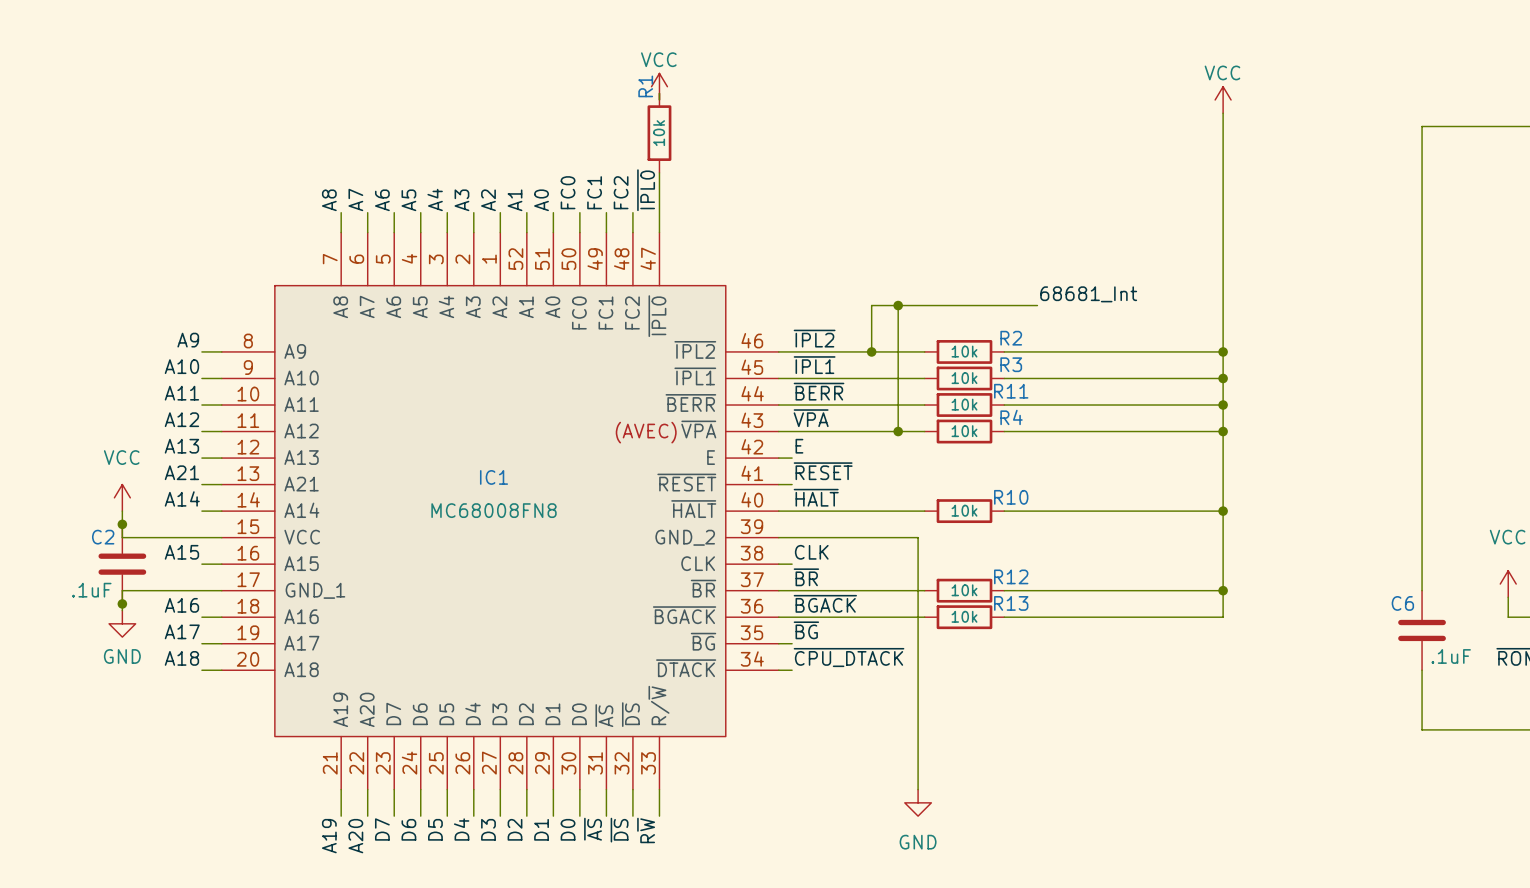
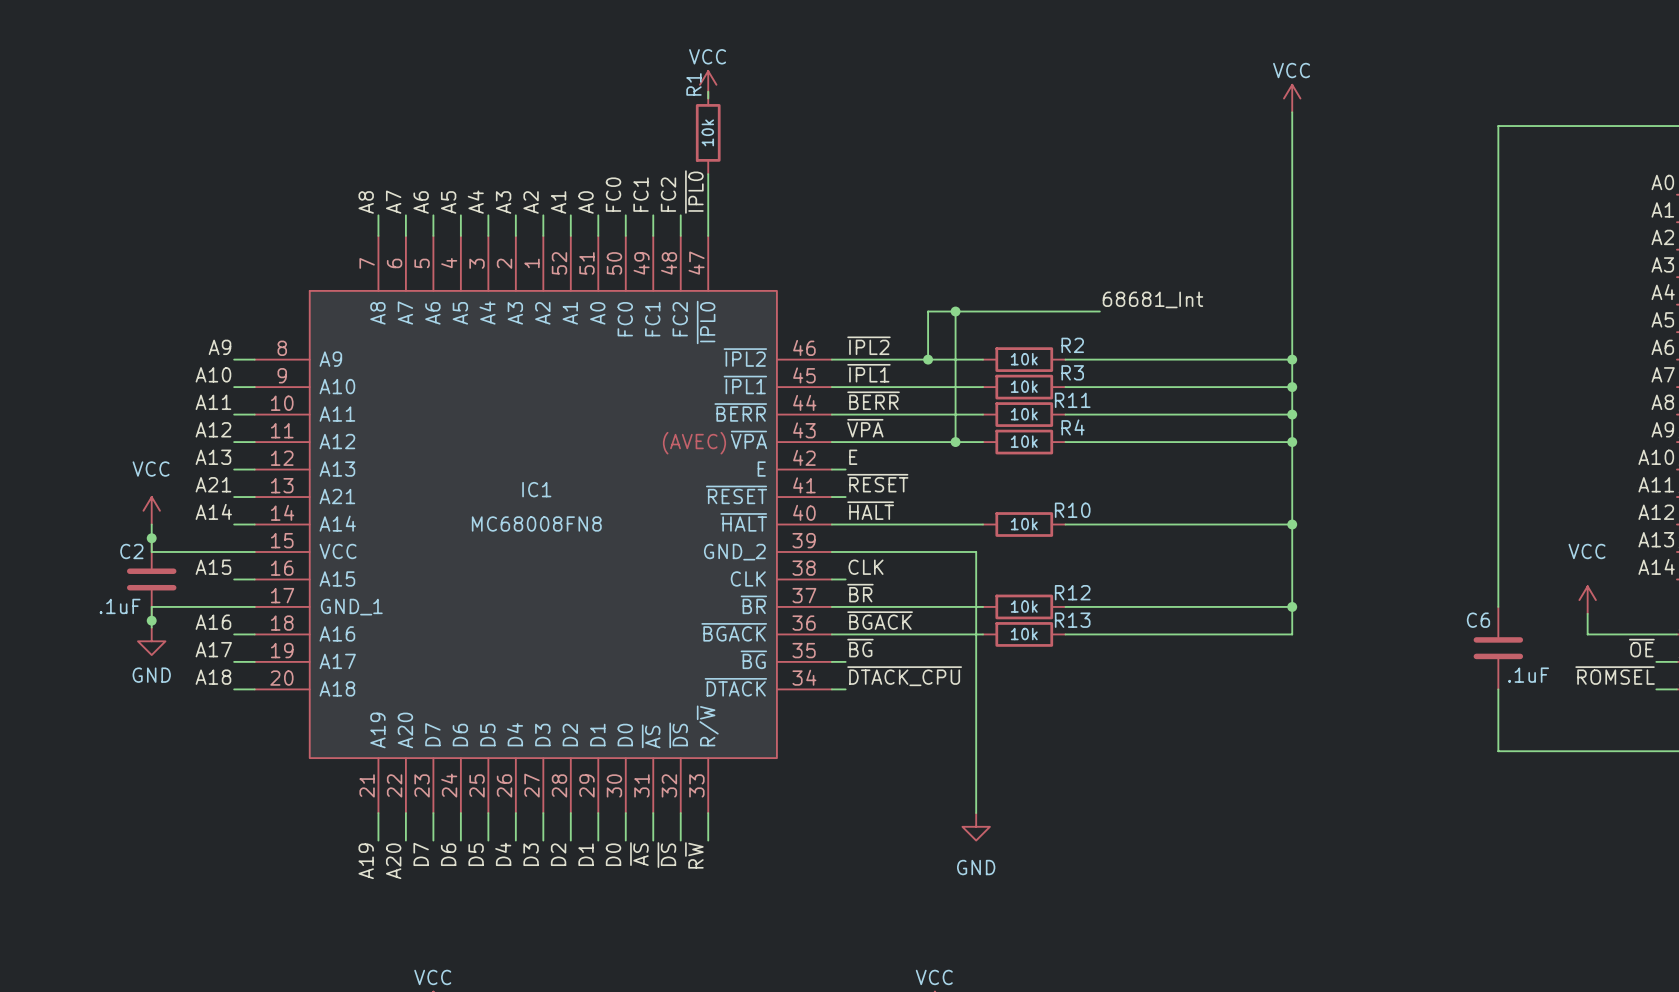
label: ~{CPU_DTACK} (849, 657) -> ~{DTACK_CPU} (904, 676)

